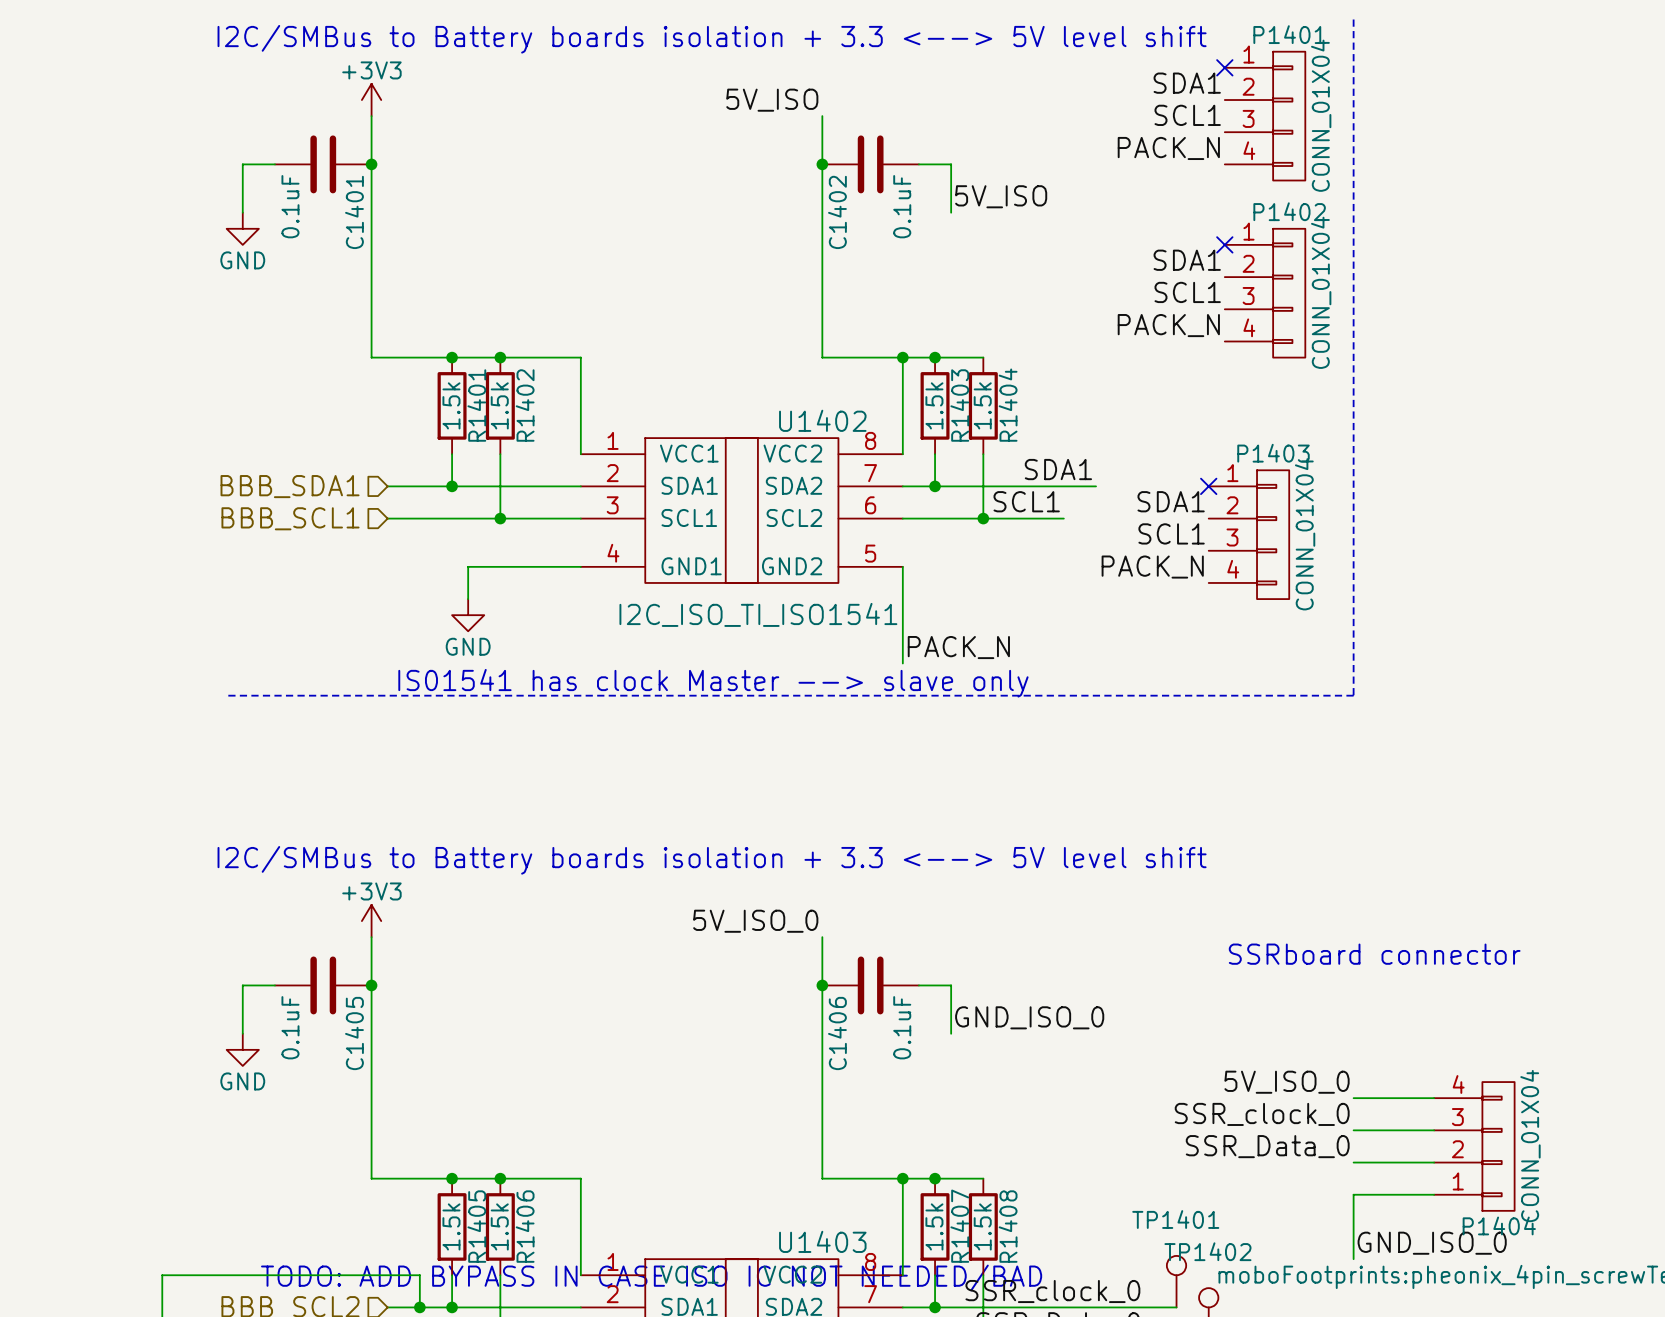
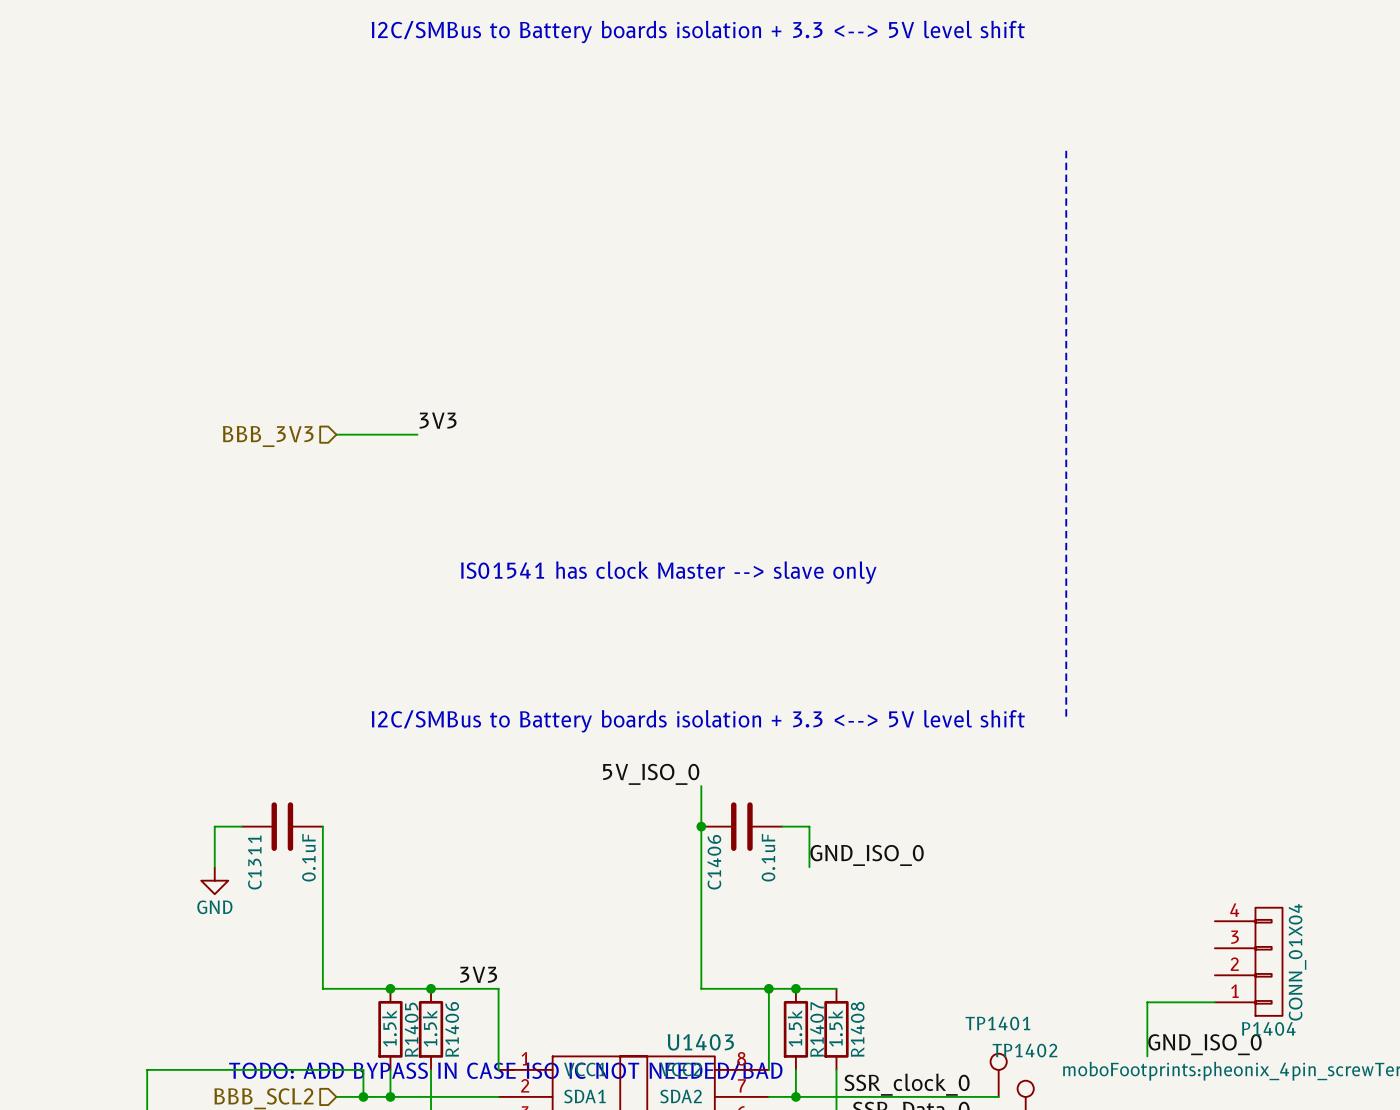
line: (1353, 19) (1353, 695) (226, 695) -> none
no-connect mark: (1224, 67) -> none
label: SDA1 (1187, 83) -> none
power symbol: +3V3 (371, 100) -> none
label: 5V_ISO (772, 100) -> none
label: SCL1 (1187, 115) -> none
wire: (371, 116) (371, 357) (580, 357) (580, 454) -> none
wire: (822, 116) (822, 357) (983, 357) -> none
P1401: CONN_01X04 (1265, 116) -> none
label: PACK_N (1168, 148) -> none
wire: (274, 164) (242, 164) (242, 212) -> none
C1401: 0.1uF (323, 164) -> none
junction: (371, 164) -> none
junction: (822, 164) -> none
C1402: 0.1uF (870, 164) -> none
wire: (918, 164) (951, 164) (951, 212) -> none
line: none -> (1066, 150) (1066, 718)
label: 5V_ISO (1001, 196) -> none
power symbol: GND (242, 228) -> none
no-connect mark: (1224, 244) -> none
label: SDA1 (1187, 260) -> none
label: SCL1 (1187, 292) -> none
P1402: CONN_01X04 (1265, 293) -> none
label: PACK_N (1168, 325) -> none
junction: (452, 357) -> none
junction: (500, 357) -> none
wire: (902, 357) (902, 454) -> none
junction: (902, 357) -> none
junction: (935, 357) -> none
R1401: 1.5k (452, 405) -> none
R1402: 1.5k (500, 405) -> none
R1403: 1.5k (935, 405) -> none
R1404: 1.5k (983, 405) -> none
wire: (452, 454) (452, 486) -> none
wire: (500, 454) (500, 518) -> none
wire: (935, 454) (935, 486) -> none
wire: (983, 454) (983, 518) -> none
label: SDA1 (1058, 469) -> none
hierarchical label: BBB_SDA1 (290, 486) -> none
wire: (387, 486) (580, 486) -> none
junction: (452, 486) -> none
wire: (902, 486) (1096, 486) -> none
junction: (935, 486) -> none
no-connect mark: (1208, 486) -> none
label: none -> 3V3 (438, 420)
label: SCL1 (1026, 501) -> none
label: SDA1 (1171, 501) -> none
U1402: I2C_ISO_TI_ISO1541 (741, 510) -> none
hierarchical label: BBB_SCL1 (290, 518) -> BBB_3V3 (268, 436)
wire: (484, 518) (580, 518) -> none
junction: (500, 518) -> none
wire: (902, 518) (1063, 518) -> none
junction: (983, 518) -> none
label: SCL1 (1171, 533) -> none
P1403: CONN_01X04 (1248, 534) -> none
wire: (580, 566) (468, 566) (468, 599) -> none
wire: (902, 566) (902, 663) -> none
label: PACK_N (1152, 567) -> none
power symbol: GND (468, 615) -> none
label: PACK_N (958, 647) -> none
power symbol: +3V3 (371, 921) -> none
wire: (371, 937) (371, 985) -> none
text: SSRboard connector (1374, 954) -> none
junction: (371, 985) -> none
C1405 value position: 0.1uF (290, 1027) -> 0.1uF (308, 857)
C1405 name: C1405 (354, 1033) -> C1311 (254, 862)
label: 5V_ISO_0 (1287, 1082) -> none
wire: (1353, 1098) (1434, 1098) -> none
label: SSR_clock_0 (1262, 1114) -> none
wire: (1353, 1130) (1434, 1130) -> none
label: SSR_Data_0 (1267, 1146) -> none
label: none -> 3V3 (478, 974)
wire: (1353, 1162) (1434, 1162) -> none

